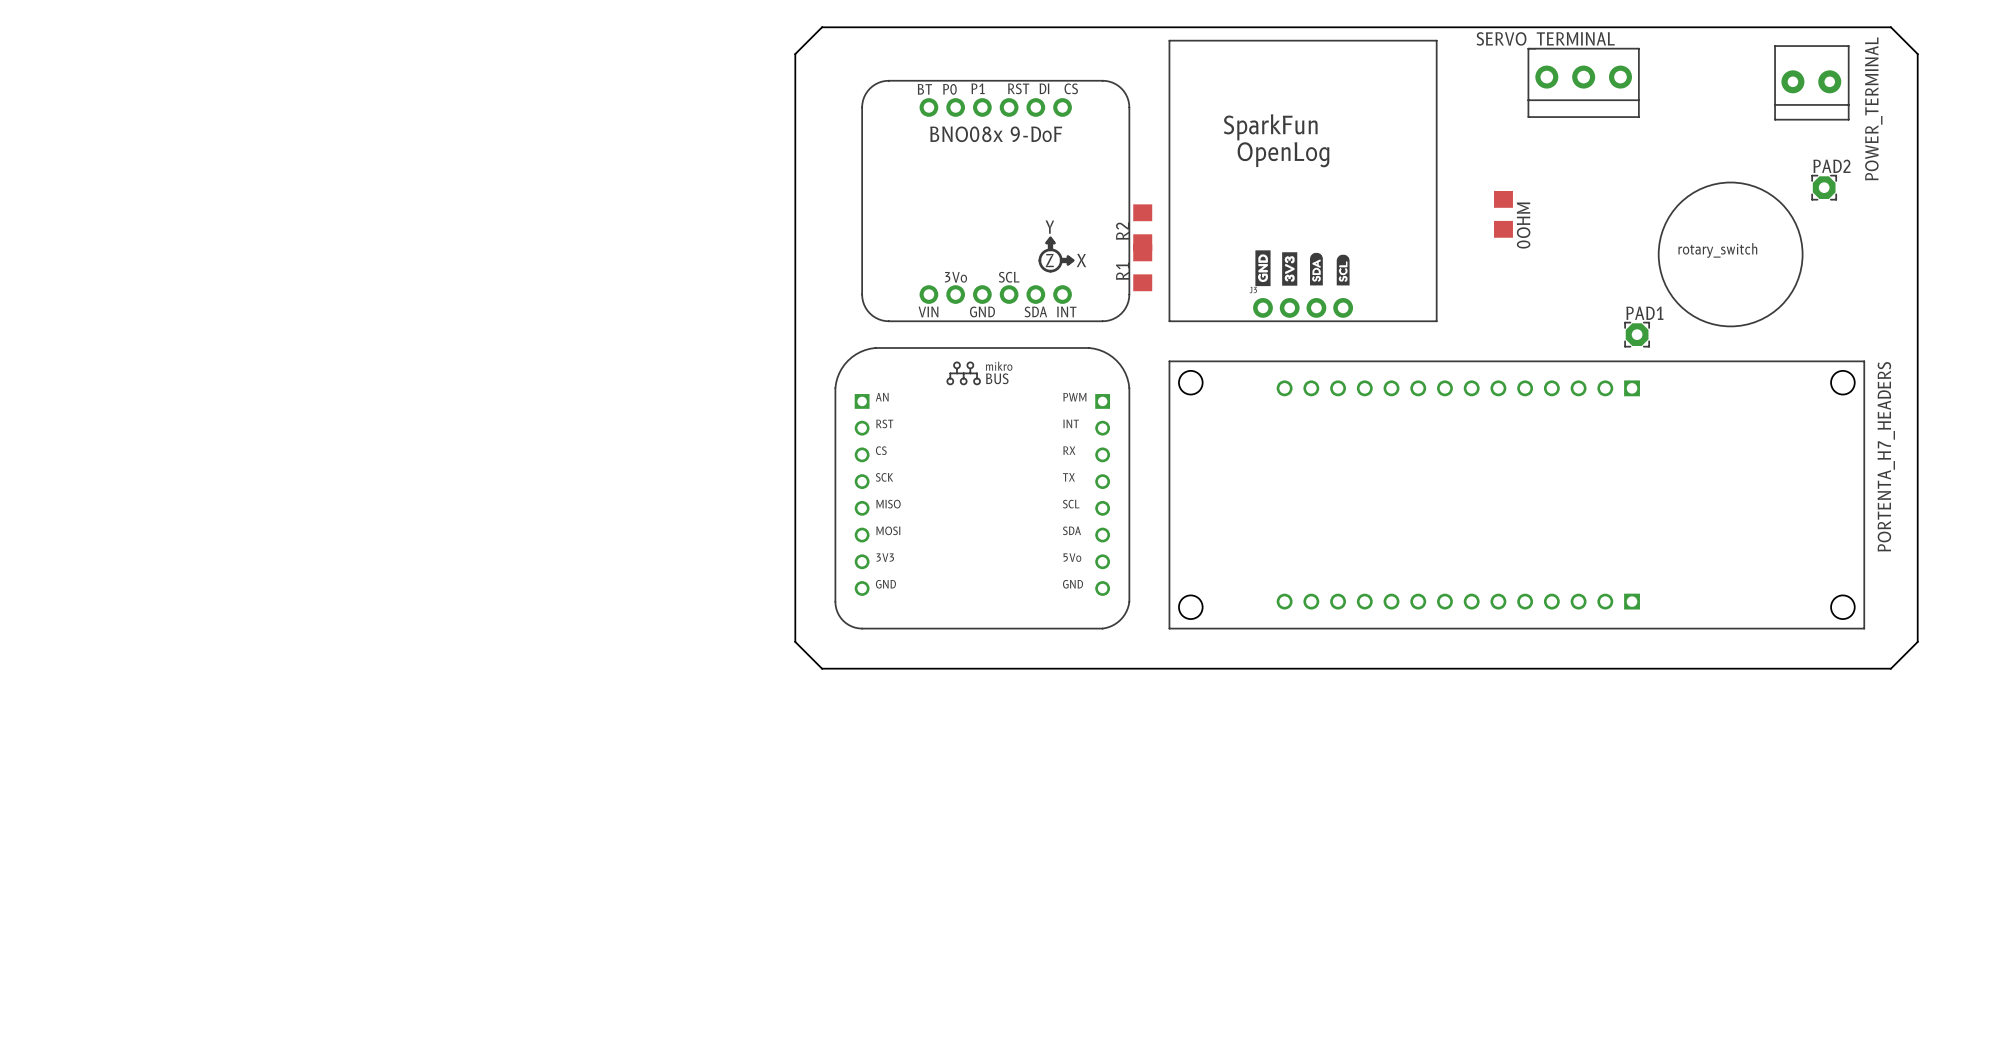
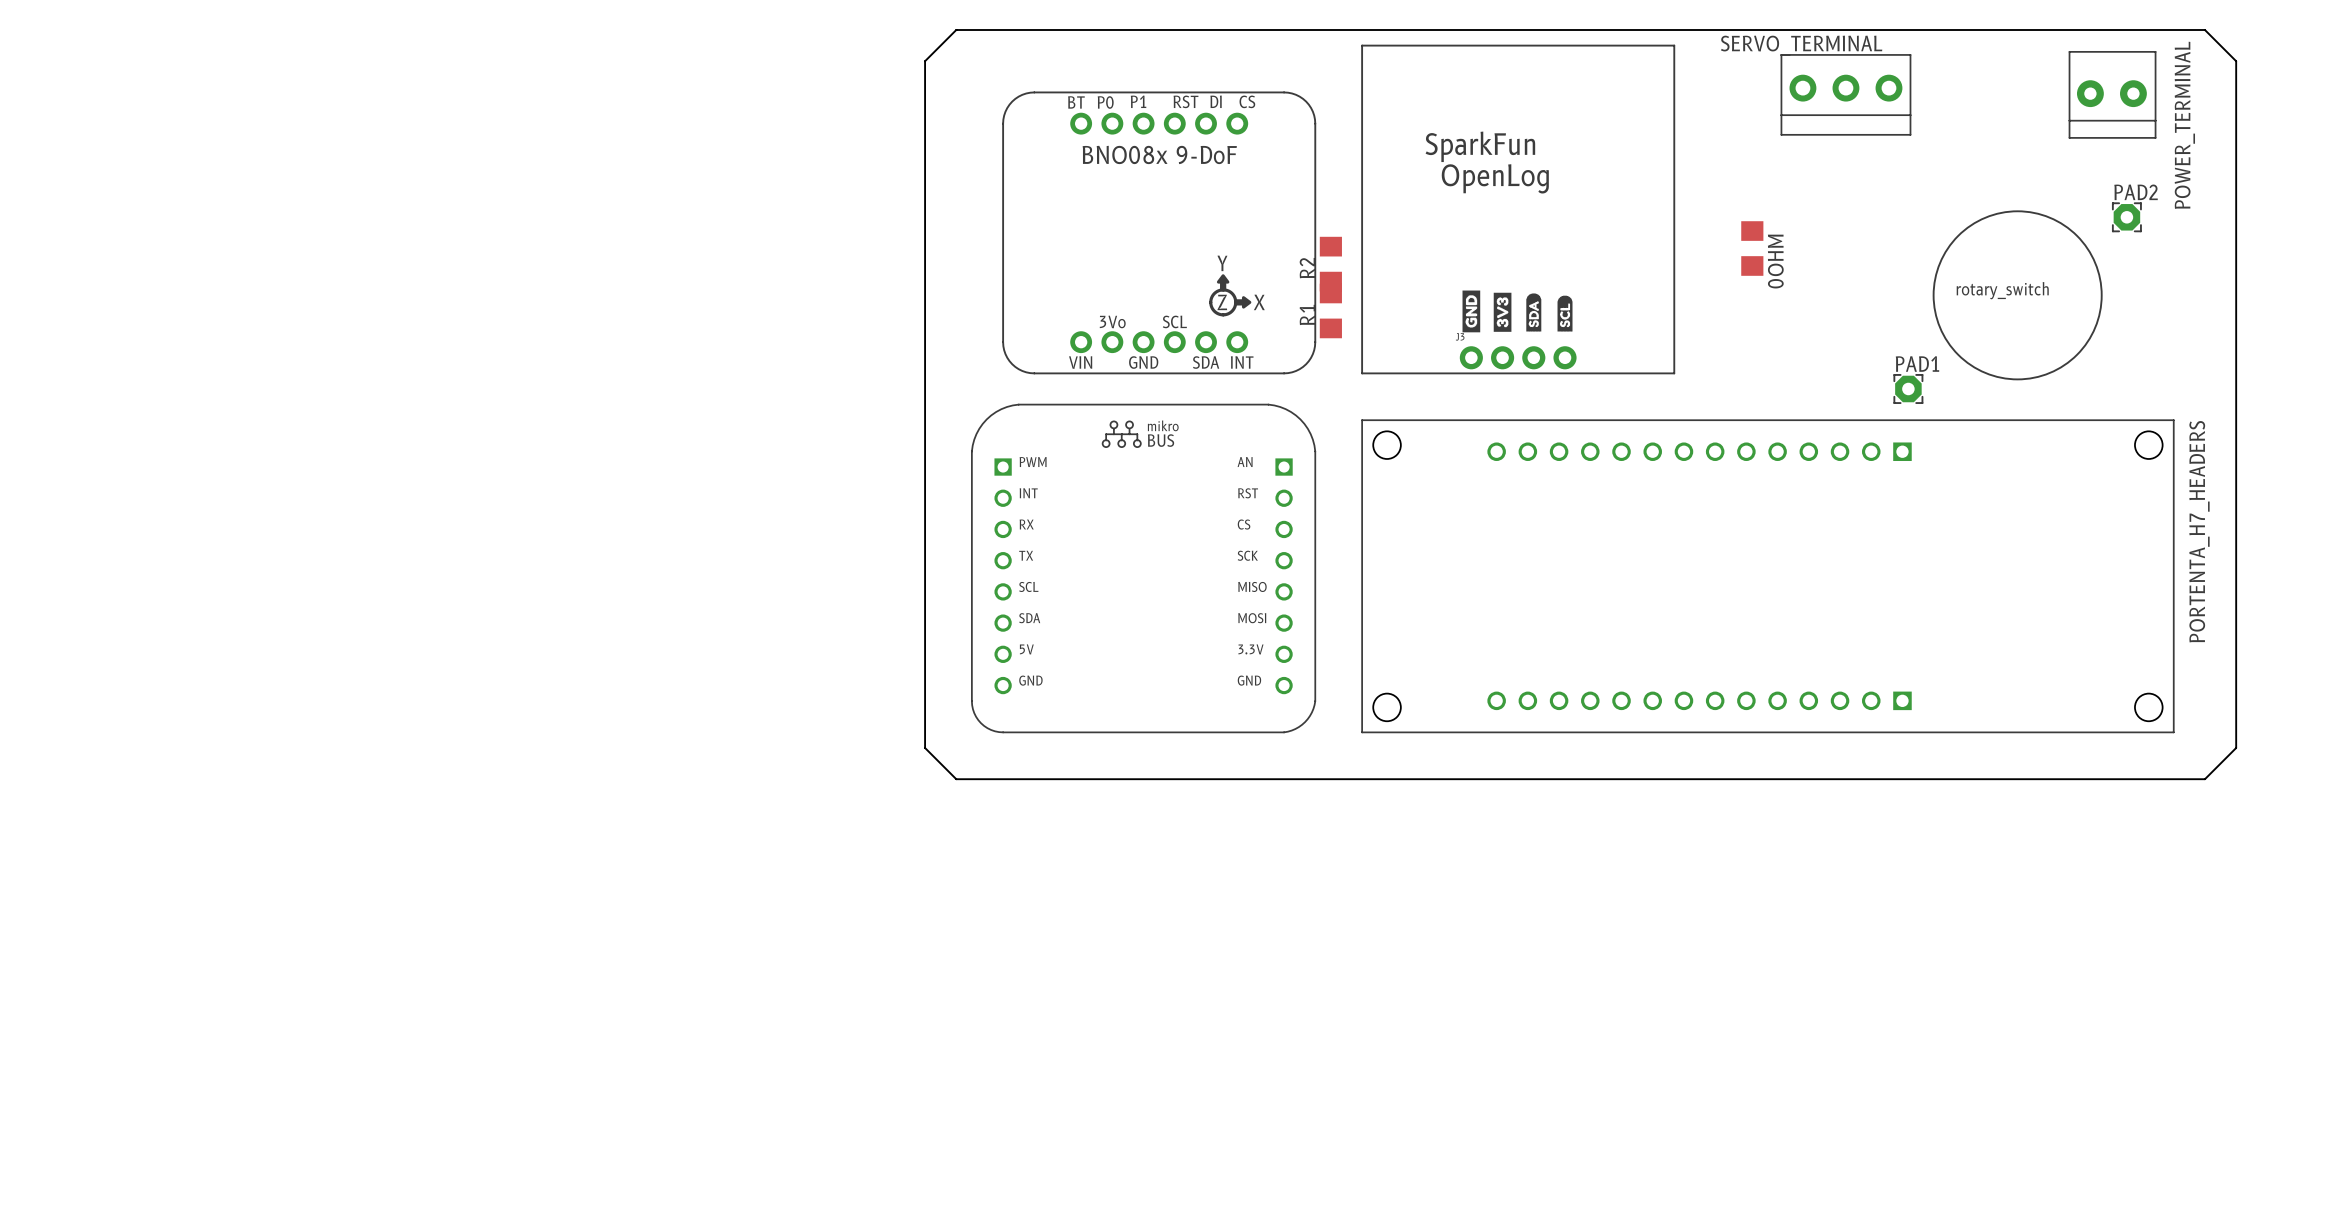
part footprint: [834, 347, 1131, 630] -> [971, 403, 1317, 734]

